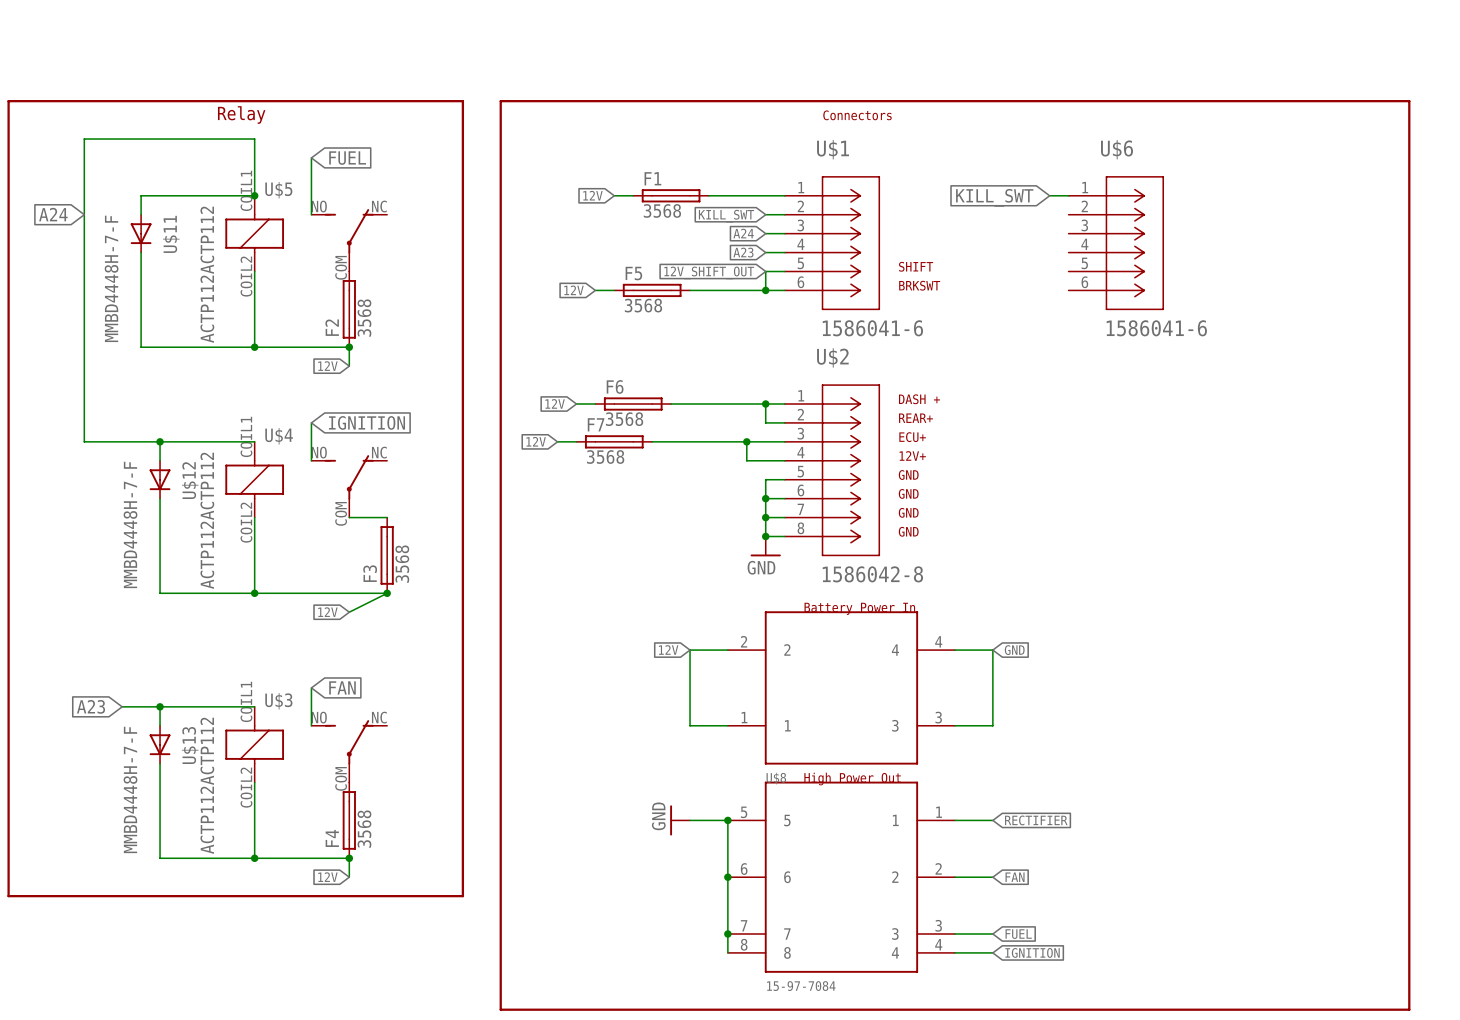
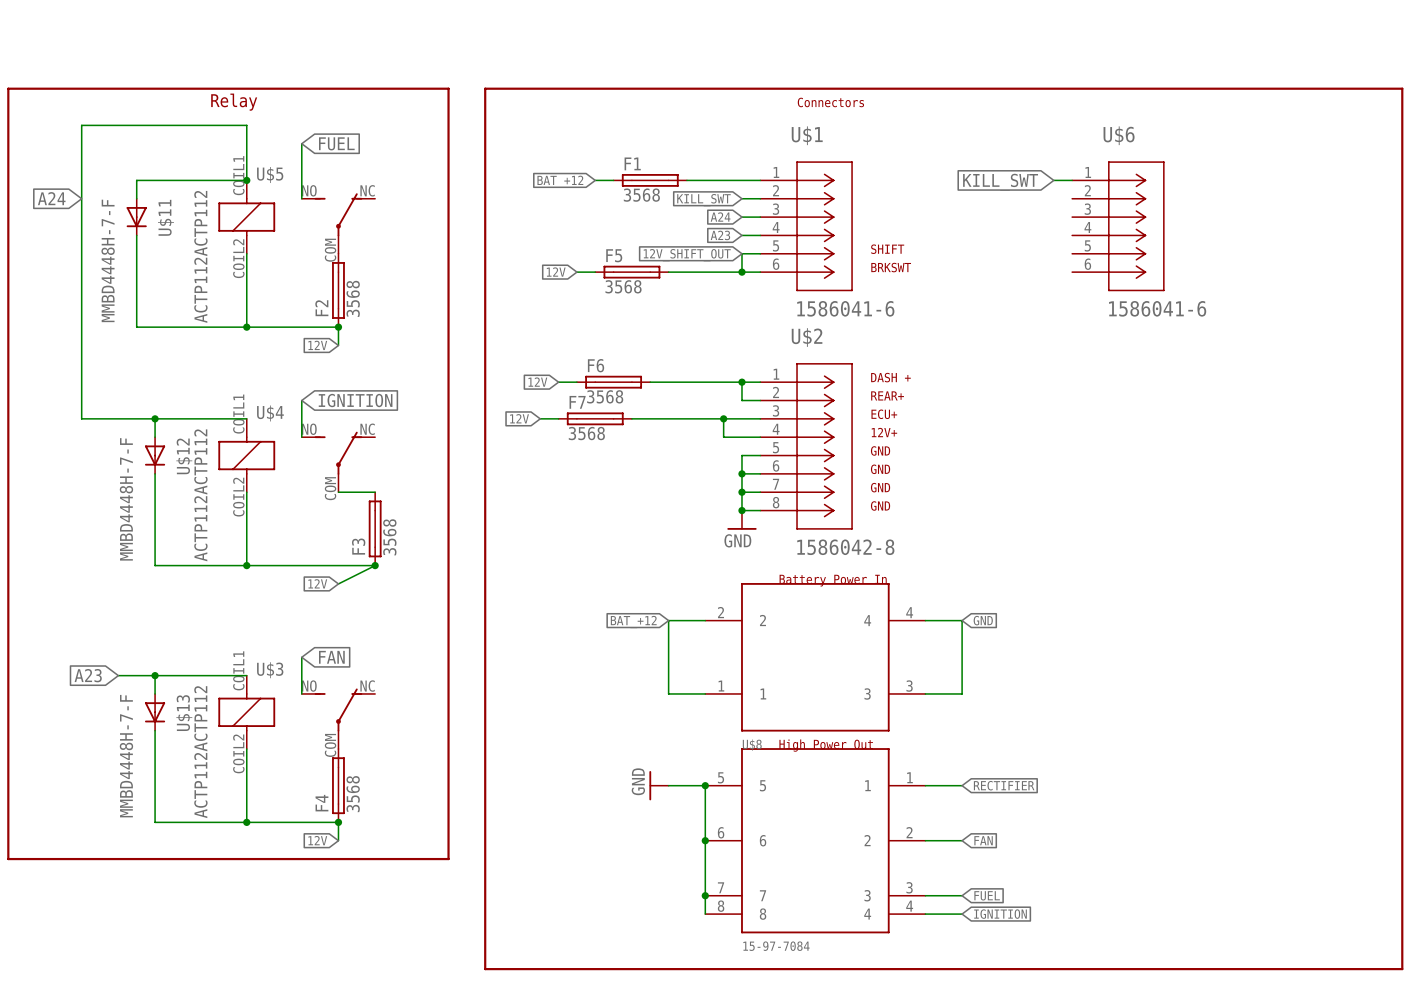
line: (1409, 101) (1409, 1009) -> (1365, 88) (1402, 88) (1402, 969) (1365, 969)
global label: 12V (592, 195) -> BAT_+12 (560, 181)
global label position: KILL_SWT (994, 197) -> KILL_SWT (1000, 182)
U$6 position: (1116, 243) -> (1118, 226)
global label: 12V (668, 649) -> BAT_+12 (633, 622)

